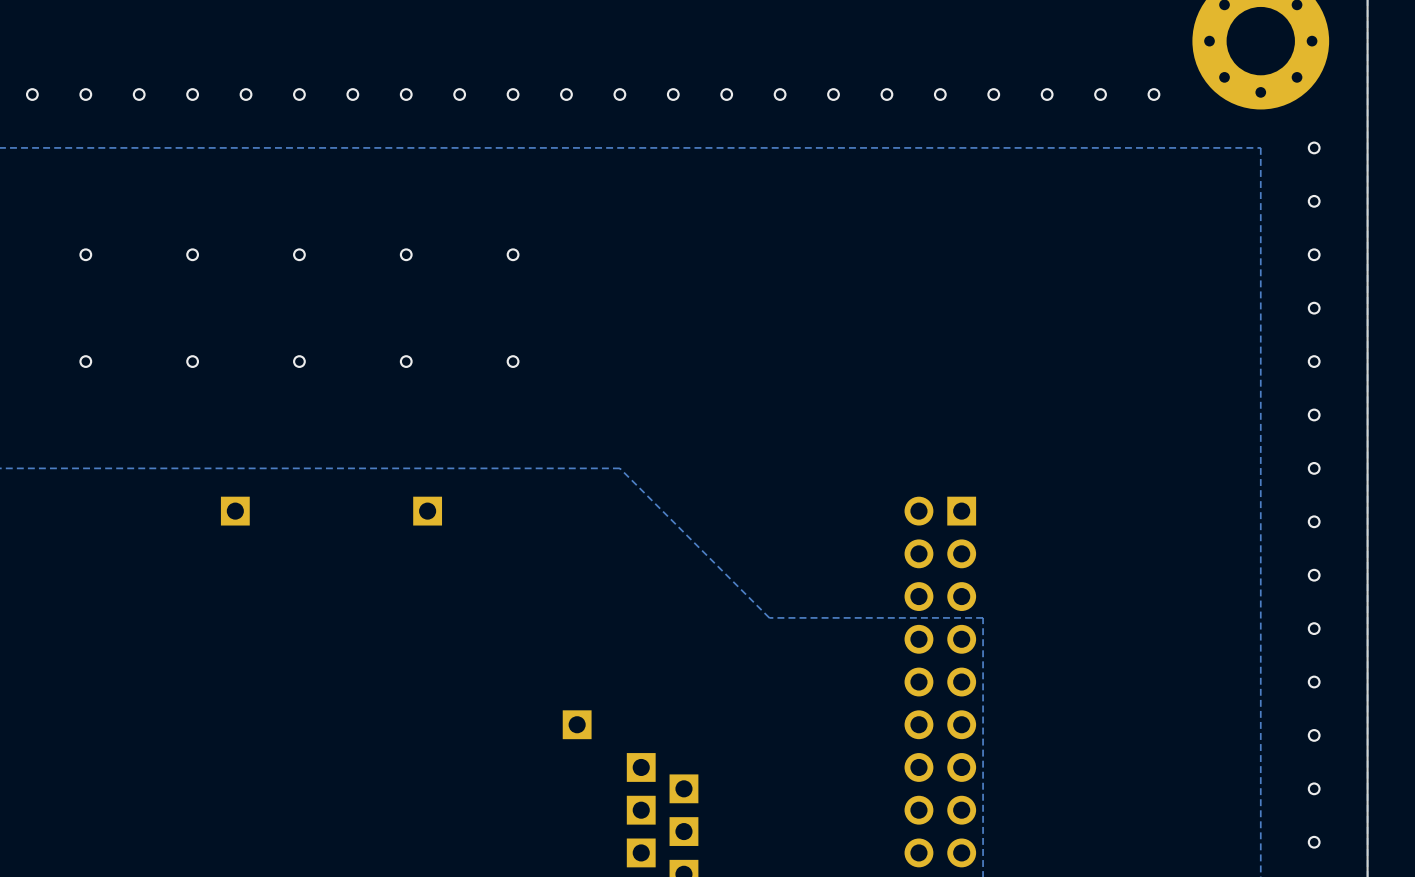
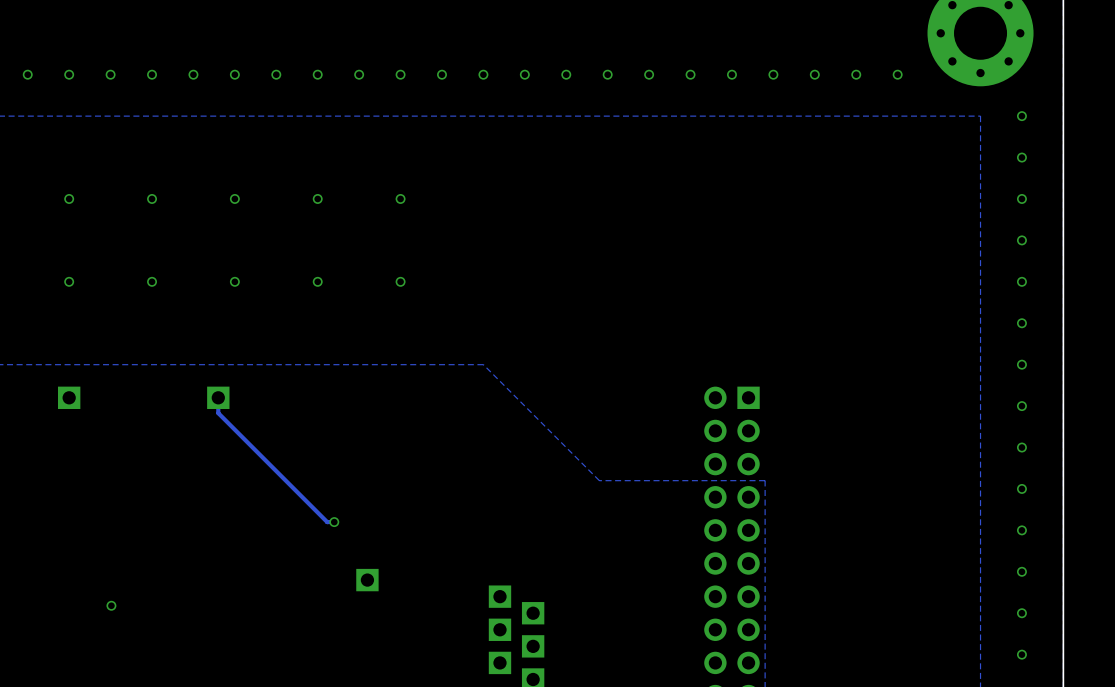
part: none -> (69, 397)
part position: (235, 511) -> (218, 397)
track: none -> (218, 397) (218, 413) (327, 522) (334, 522)
part: (427, 511) -> none
via: none -> (334, 522)
part position: (577, 724) -> (367, 580)
via: none -> (111, 605)

